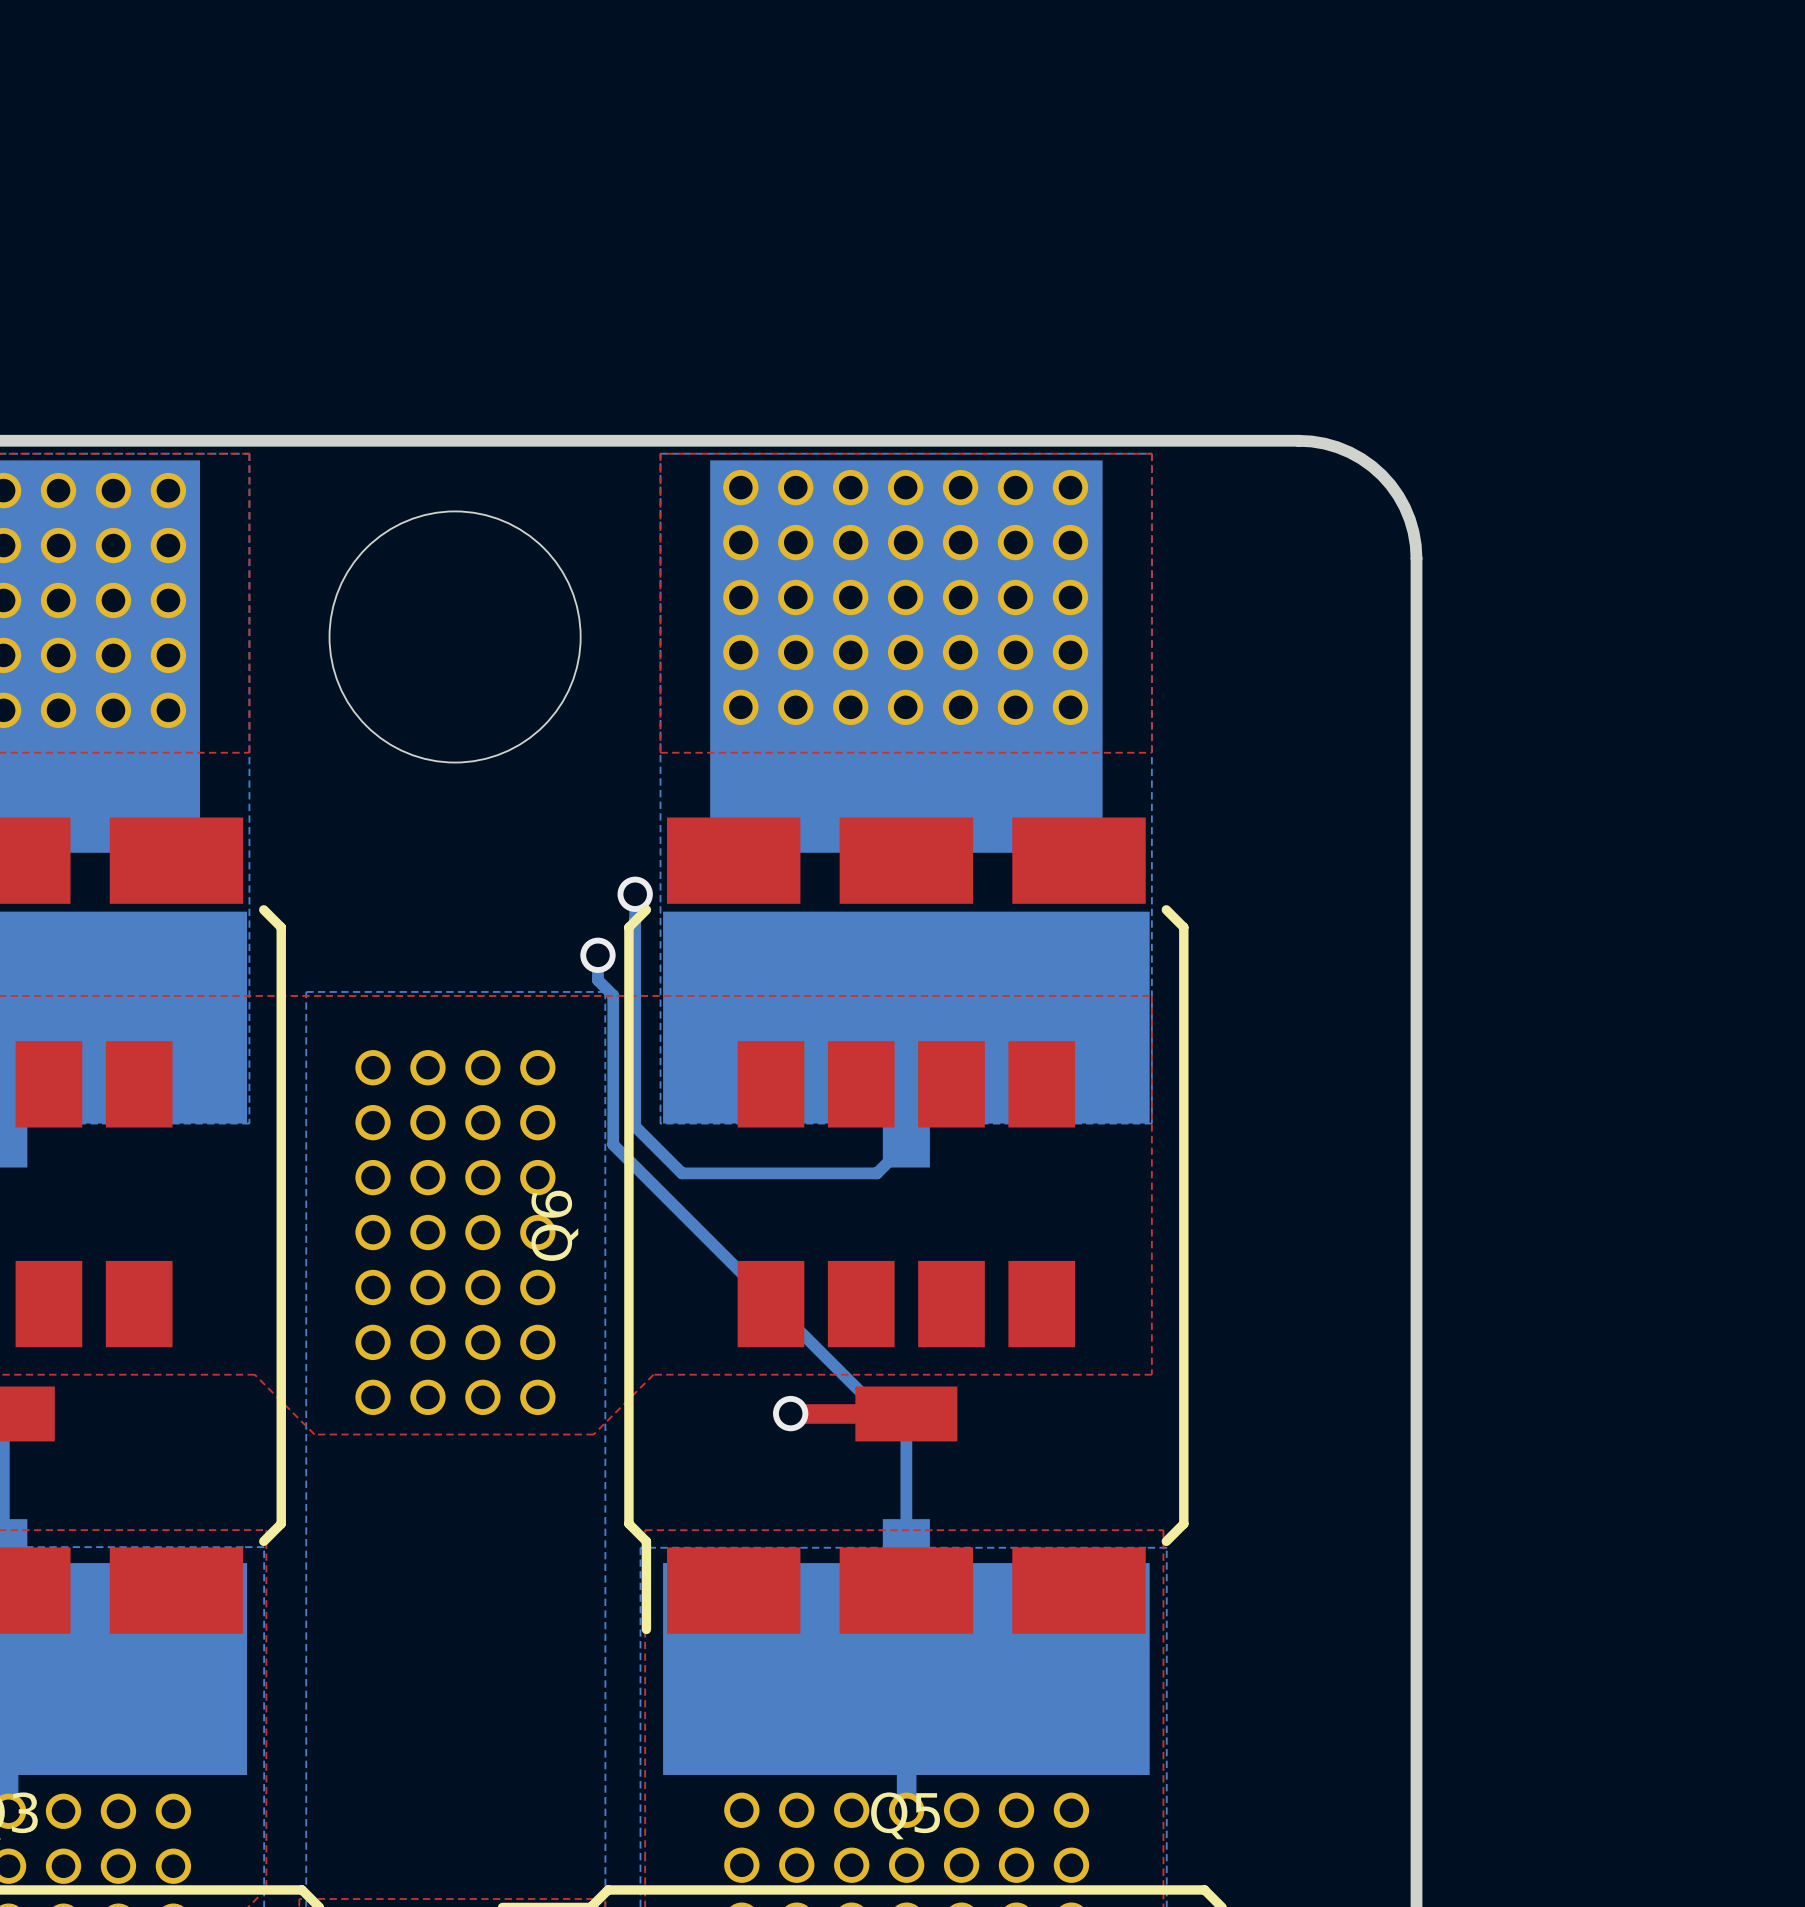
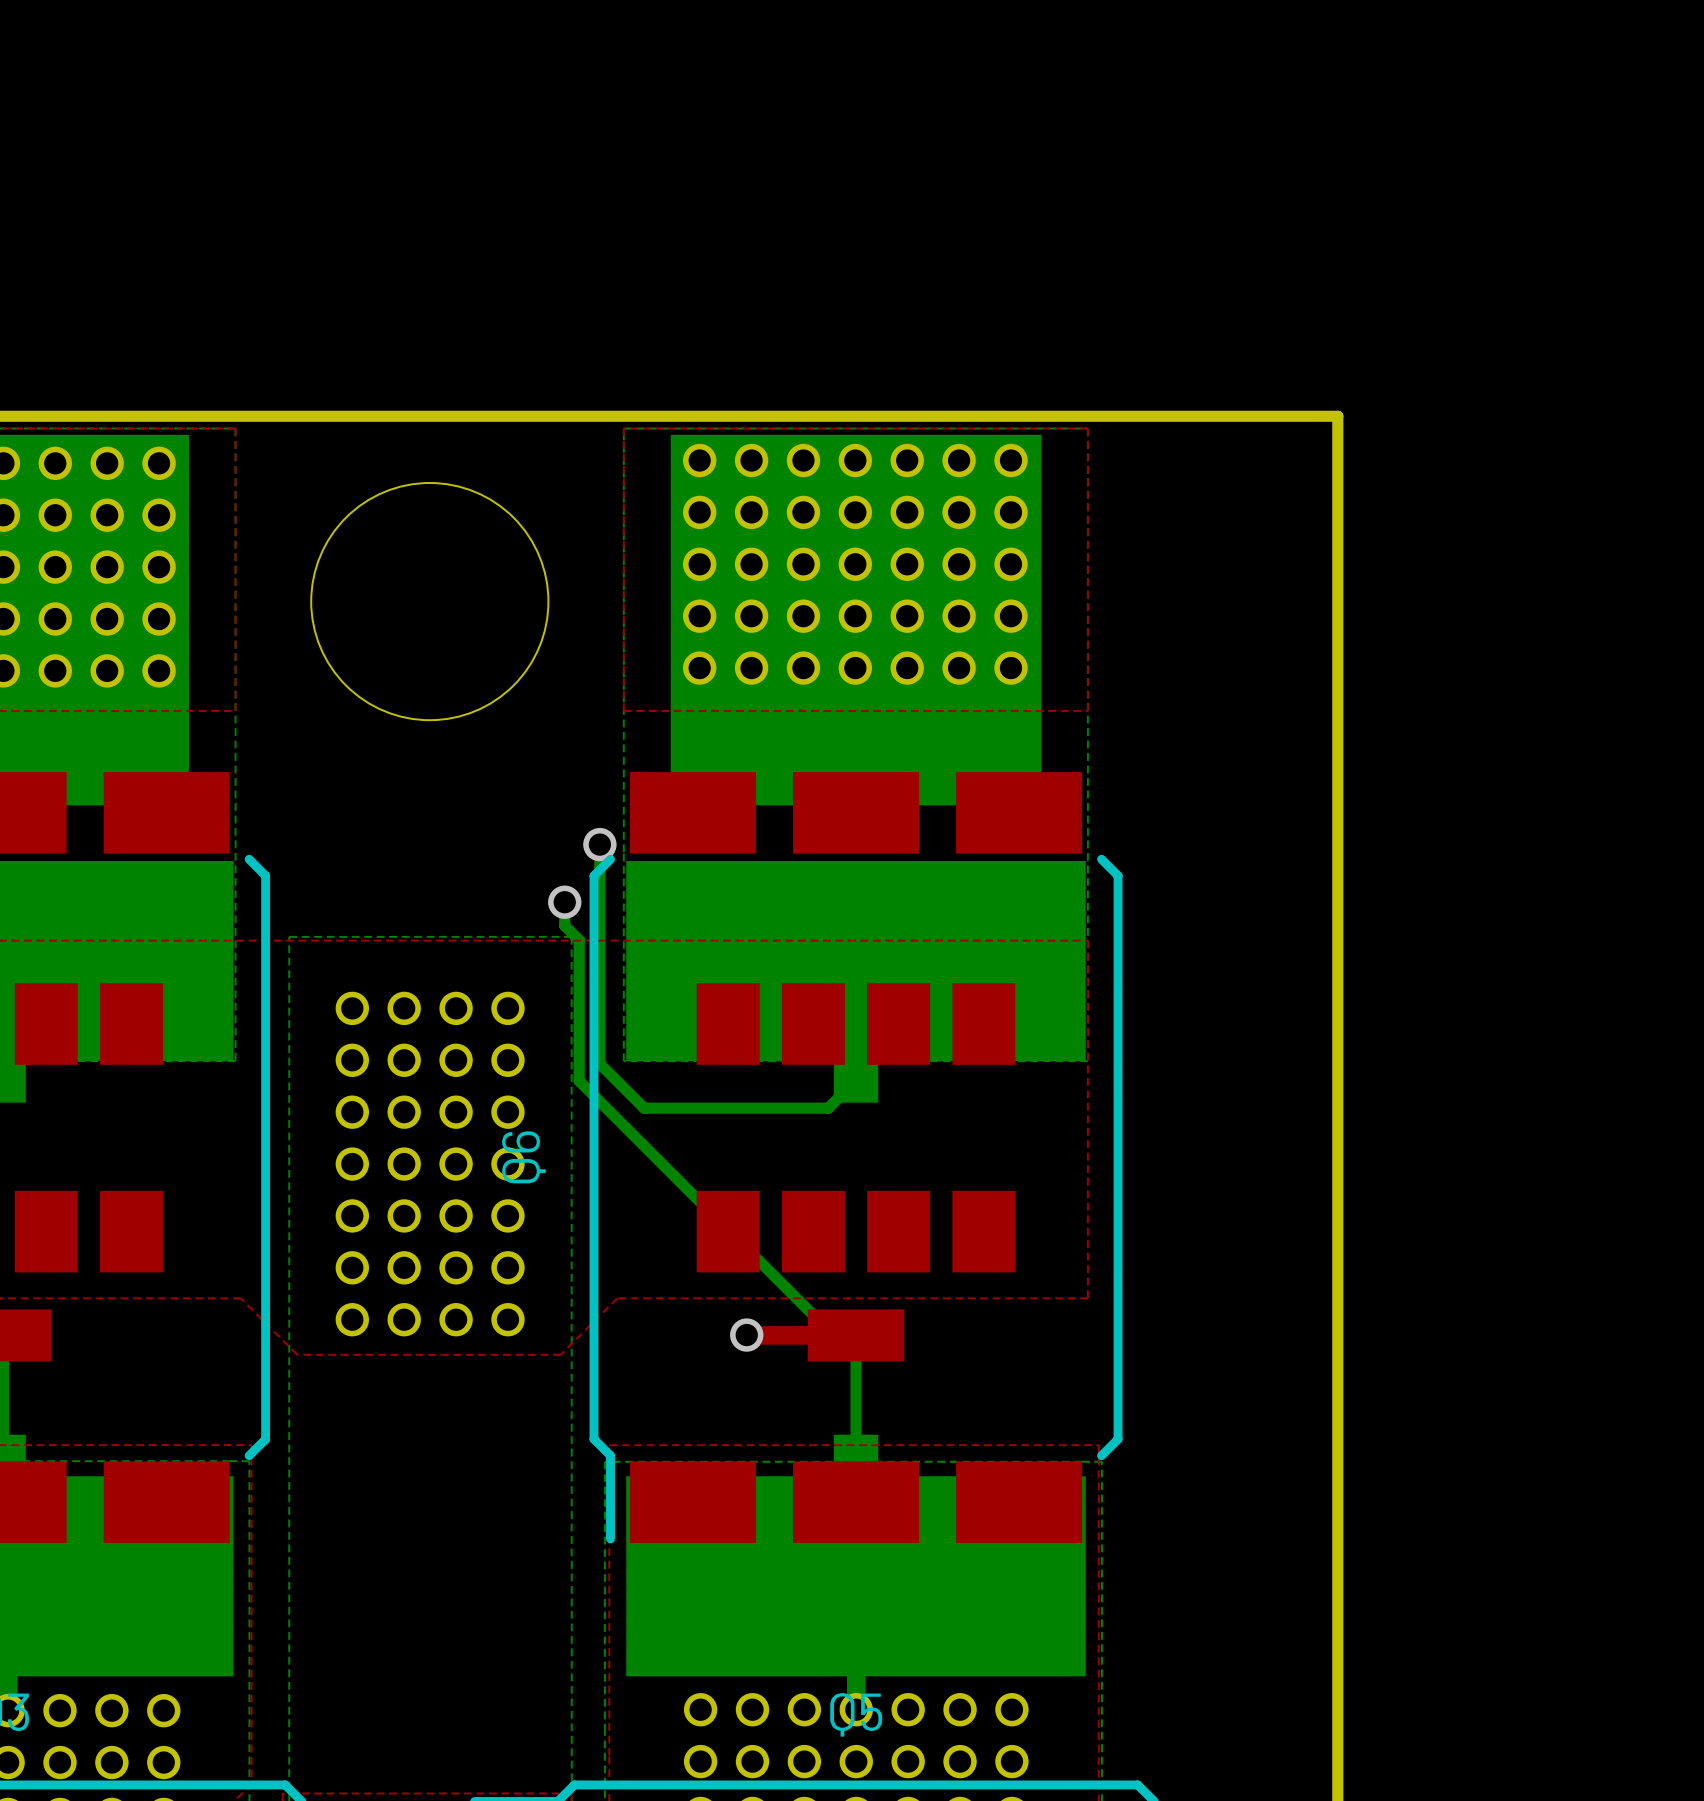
board edge: (1298, 440) (1337, 447) (1361, 458) (1381, 475) (1404, 507) (1413, 532) (1416, 558) -> (1226, 416) (1337, 416) (1337, 527)

